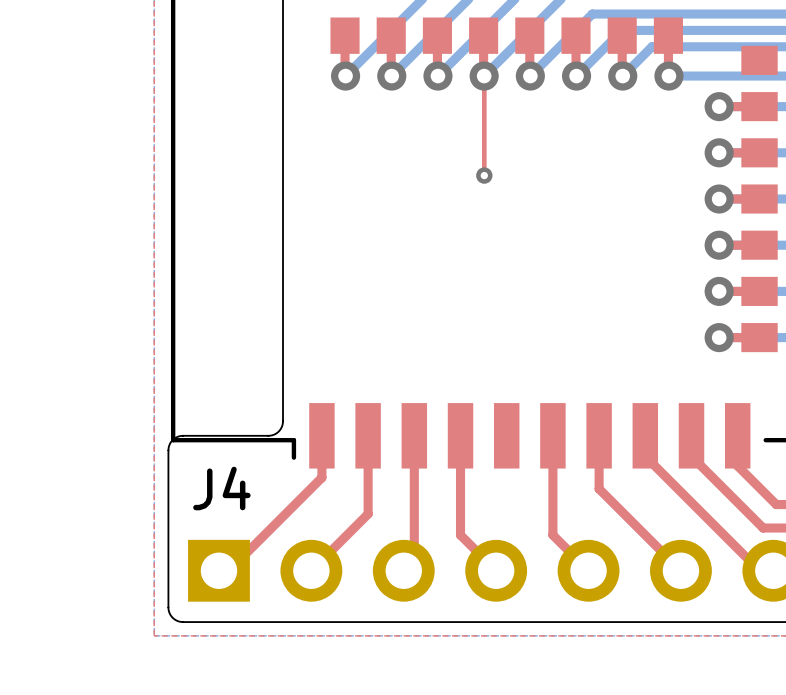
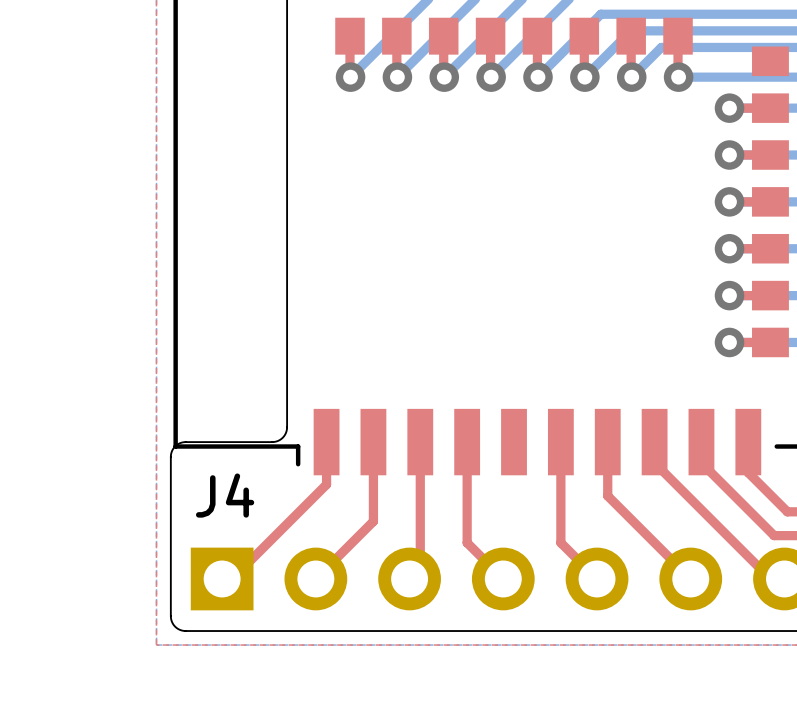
top track: (484, 76) (484, 175) -> none
via: (484, 175) -> none

